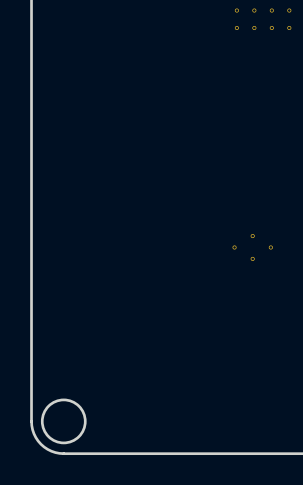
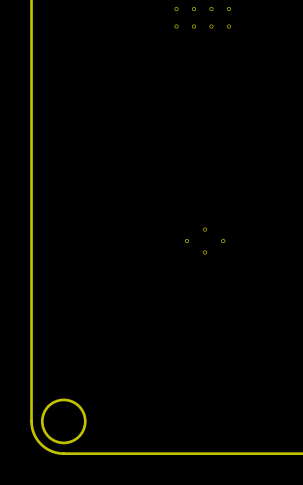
part position: (263, 19) -> (202, 17)
part position: (252, 247) -> (205, 241)

